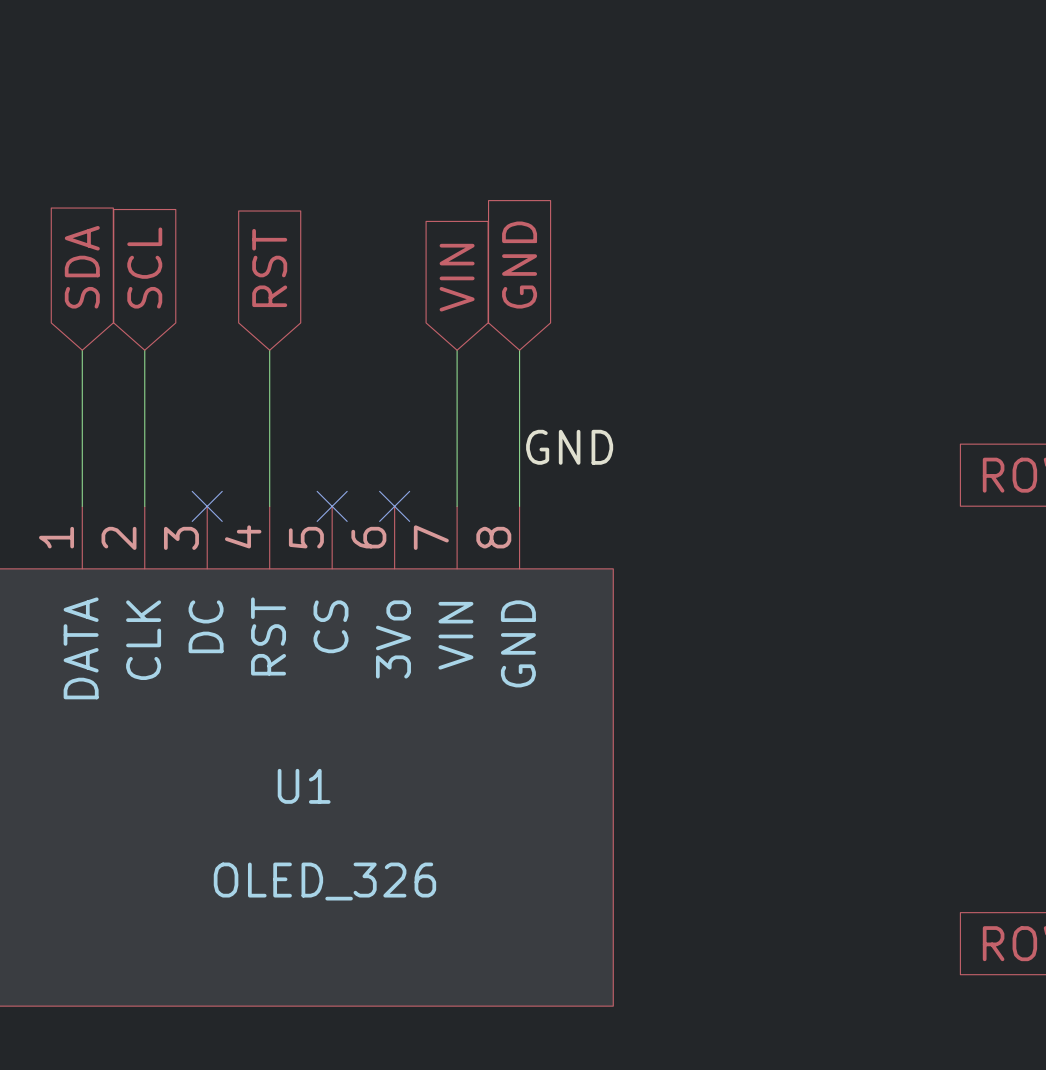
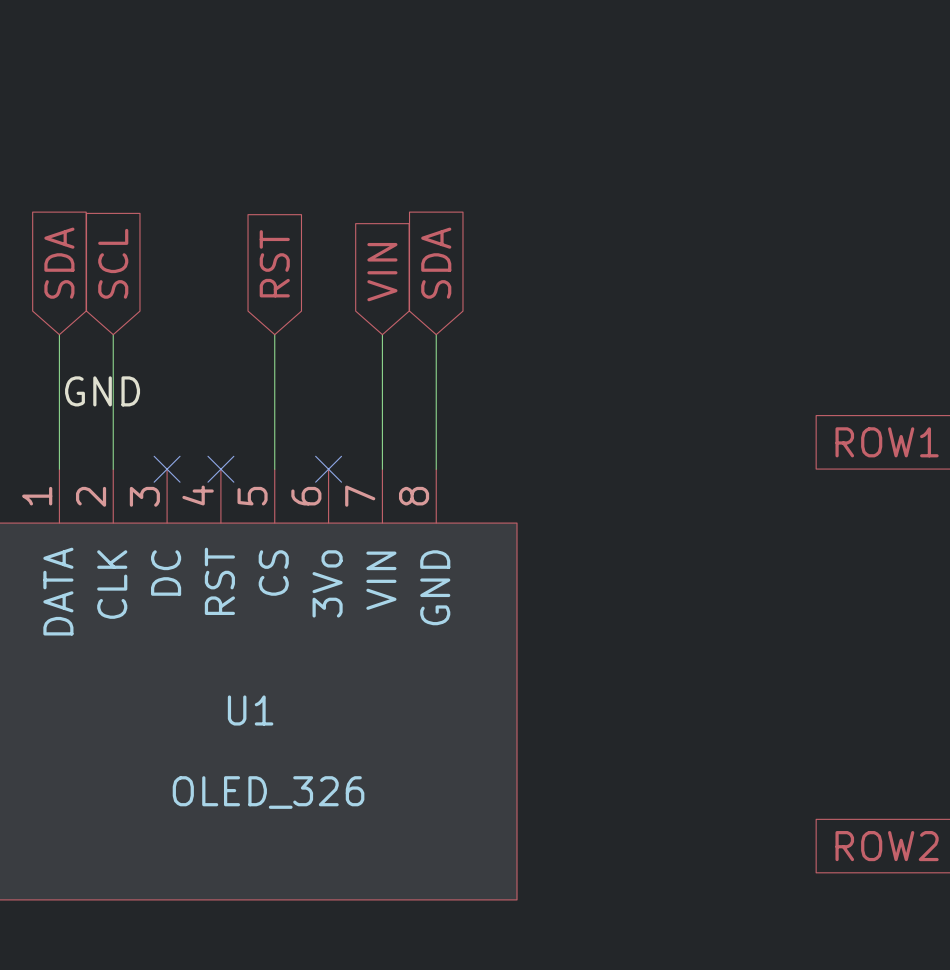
global label: GND (519, 265) -> SDA (436, 263)
global label position: RST (269, 268) -> RST (274, 263)
wire: (269, 350) (269, 506) -> (274, 334) (274, 469)
label position: GND (569, 447) -> GND (102, 391)
no-connect mark position: (332, 506) -> (220, 469)

